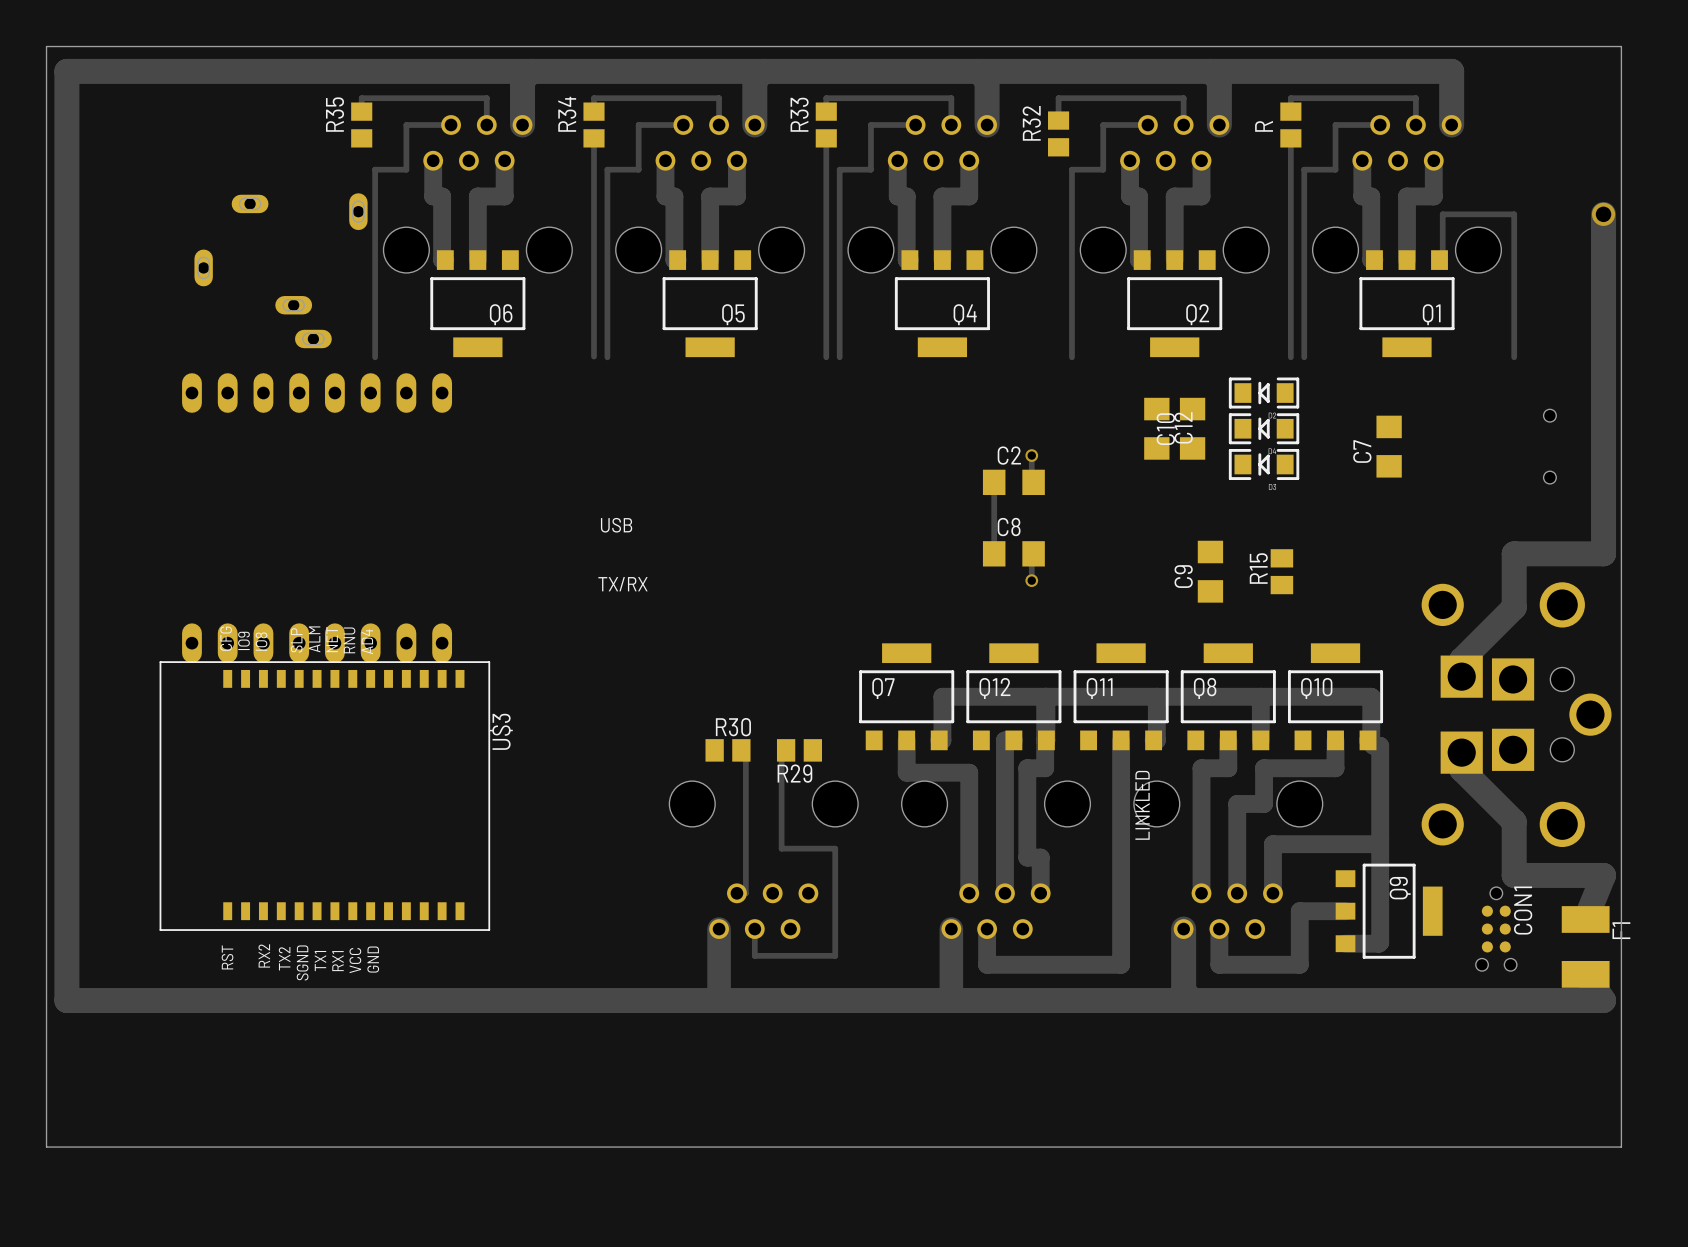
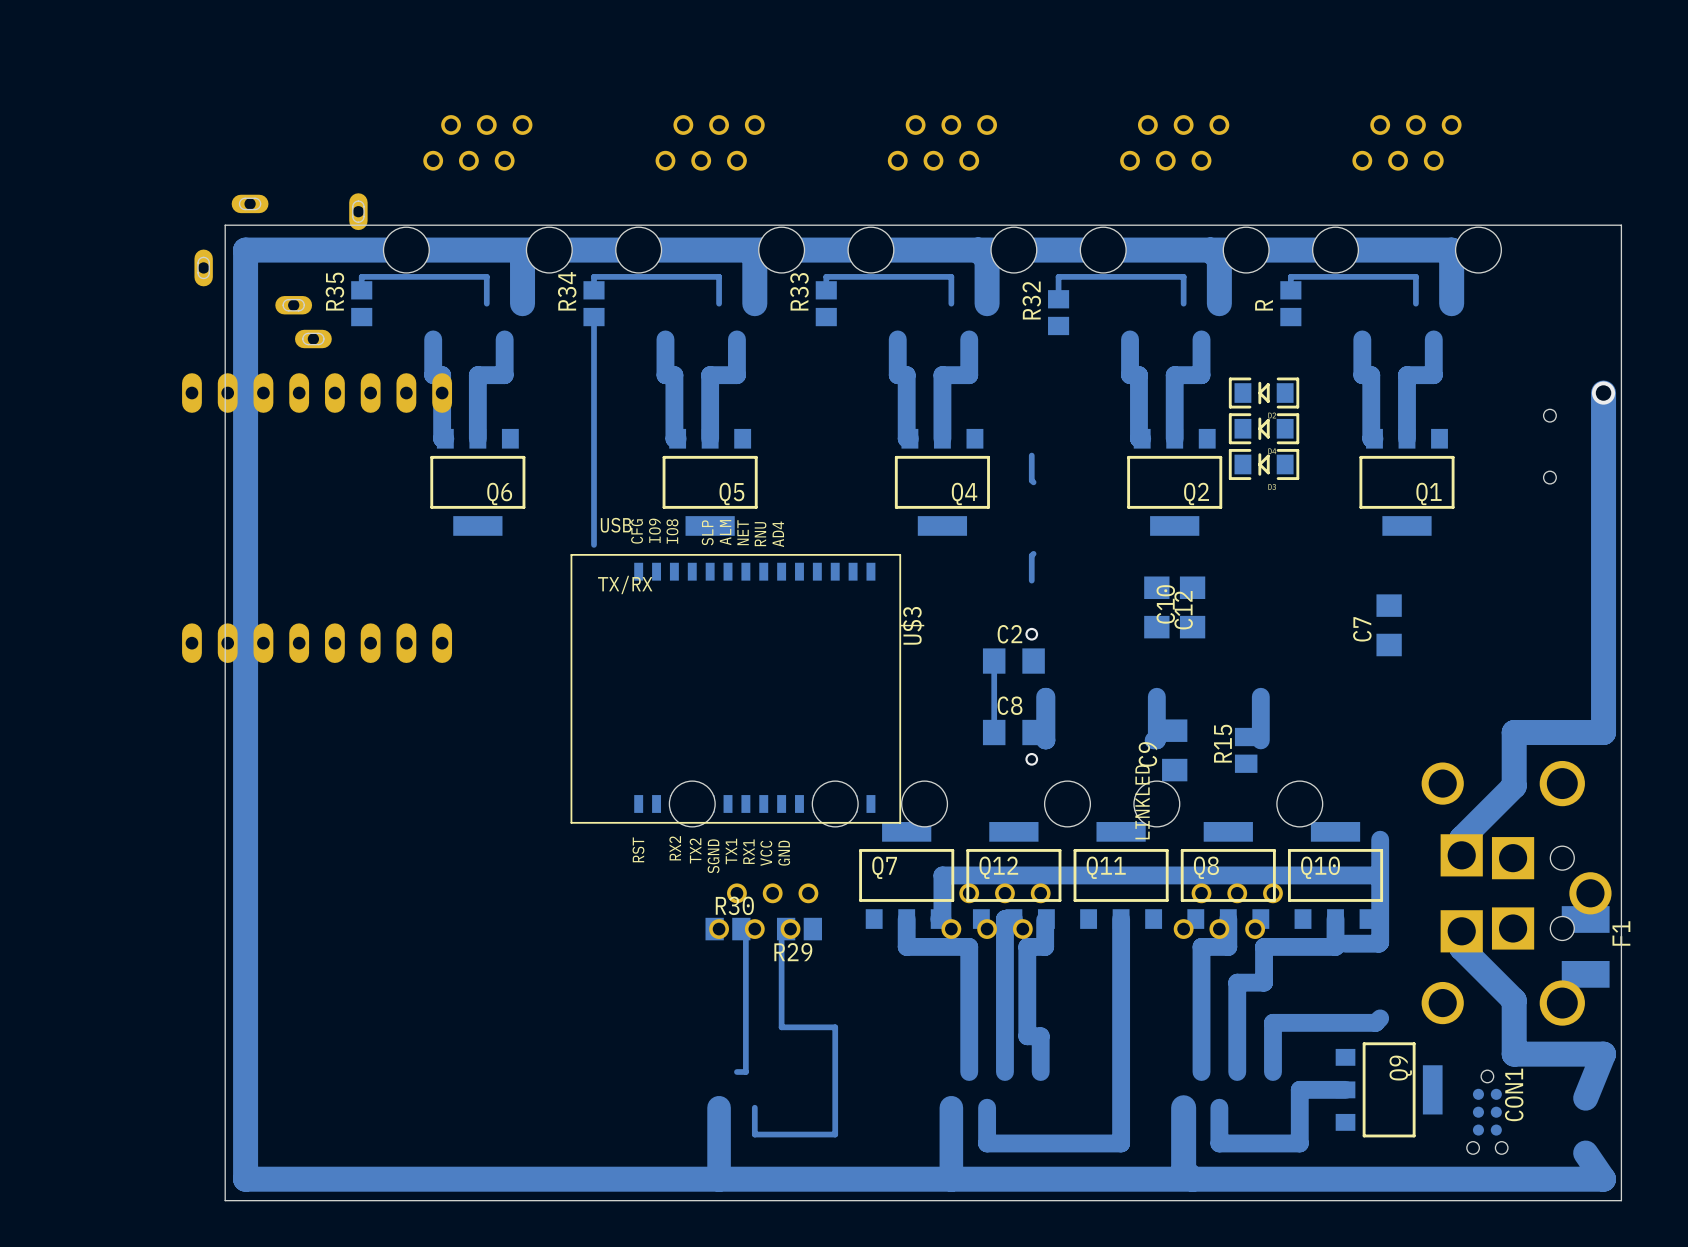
track: (531, 71) (522, 80) (522, 125) -> (531, 250) (522, 259) (522, 303)
track: (763, 71) (754, 80) (754, 125) -> (763, 250) (754, 259) (754, 303)
track: (978, 71) (987, 80) (987, 125) -> (978, 250) (987, 259) (987, 303)
track: (1210, 71) (1219, 80) (1219, 125) -> (1210, 250) (1219, 259) (1219, 303)
track: (361, 111) (361, 98) (486, 98) (486, 125) -> (361, 290) (361, 276) (486, 276) (486, 303)
track: (594, 111) (594, 98) (719, 98) (719, 125) -> none
track: (826, 111) (826, 98) (951, 98) (951, 125) -> none
track: (1290, 111) (1290, 98) (1415, 98) (1415, 125) -> none
track: (1058, 120) (1058, 98) (1183, 98) (1183, 125) -> (1058, 299) (1058, 276) (1183, 276) (1183, 303)
R35 position: (361, 125) -> (361, 303)
track: (451, 125) (406, 125) (406, 169) (375, 169) (375, 357) -> none
R34 position: (594, 125) -> (594, 303)
track: (683, 125) (638, 125) (638, 169) (607, 169) (607, 357) -> none
R33 position: (826, 125) -> (826, 303)
track: (915, 125) (870, 125) (870, 169) (839, 169) (839, 357) -> none
track: (1147, 125) (1103, 125) (1103, 169) (1071, 169) (1071, 357) -> none
R position: (1290, 125) -> (1290, 303)
track: (1380, 125) (1335, 125) (1335, 169) (1304, 169) (1304, 357) -> none
track: (1451, 125) (1451, 71) (66, 71) (66, 1000) (1603, 1000) (1585, 974) -> none
R32 position: (1058, 133) -> (1058, 312)
track: (594, 138) (594, 276) -> (719, 303) (719, 276) (594, 276)
track: (826, 138) (826, 276) -> (951, 303) (951, 276) (826, 276)
track: (1290, 138) (1290, 276) -> (1415, 303) (1415, 276) (1290, 276)
track: (433, 160) (433, 196) (442, 196) (442, 260) (445, 260) -> (433, 339) (433, 375) (442, 375) (442, 438) (445, 438)
track: (504, 160) (504, 196) (477, 196) (477, 260) -> (504, 339) (504, 375) (477, 375) (477, 438)
track: (665, 160) (665, 196) (674, 196) (674, 260) (677, 260) -> (665, 339) (665, 375) (674, 375) (674, 438) (677, 438)
track: (736, 160) (736, 196) (710, 196) (710, 260) -> (736, 339) (736, 375) (710, 375) (710, 438)
track: (897, 160) (897, 196) (906, 196) (906, 260) (909, 260) -> (897, 339) (897, 375) (906, 375) (906, 438) (909, 438)
track: (969, 160) (969, 196) (942, 196) (942, 260) -> (969, 339) (969, 375) (942, 375) (942, 438)
track: (1130, 160) (1130, 196) (1138, 196) (1138, 260) (1142, 260) -> (1130, 339) (1130, 375) (1138, 375) (1138, 438) (1142, 438)
track: (1201, 160) (1201, 196) (1174, 196) (1174, 260) -> (1201, 339) (1201, 375) (1174, 375) (1174, 438)
track: (1362, 160) (1362, 196) (1371, 196) (1371, 260) (1374, 260) -> (1362, 339) (1362, 375) (1371, 375) (1371, 438) (1374, 438)
track: (1433, 160) (1433, 196) (1406, 196) (1406, 260) -> (1433, 339) (1433, 375) (1406, 375) (1406, 438)
track: (1603, 214) (1603, 393) -> none
via: (1603, 214) -> none
board edge: (1621, 225) (1621, 46) (46, 46) (46, 1147) (1621, 1147) -> (1621, 225) (225, 225) (225, 1200) (1621, 1200) (1621, 1147)
track: (1439, 260) (1442, 260) (1442, 214) (1514, 214) (1514, 357) -> none
track: (594, 290) (594, 317) -> none
track: (826, 290) (826, 357) -> none
track: (1290, 290) (1290, 357) -> none
Q6 position: (477, 303) -> (477, 482)
Q5 position: (710, 303) -> (710, 482)
Q4 position: (942, 303) -> (942, 482)
Q2 position: (1174, 303) -> (1174, 482)
Q1 position: (1406, 303) -> (1406, 482)
track: none -> (1451, 303) (1451, 250) (245, 250) (245, 1179) (1603, 1179) (1585, 1153)
track: none -> (594, 356) (594, 544)
via: none -> (1603, 393)
C12 position: (1156, 428) -> (1156, 607)
C10 position: (1192, 428) -> (1192, 607)
C7 position: (1389, 446) -> (1389, 625)
via: (1031, 455) -> none
track: (994, 482) (994, 553) -> (994, 661) (994, 732)
C2 position: (1013, 482) -> (1013, 661)
C8 position: (1013, 553) -> (1013, 732)
track: (1603, 553) (1514, 553) (1514, 607) (1461, 659) (1461, 676) -> (1603, 553) (1603, 732) (1514, 732) (1514, 786) (1461, 838) (1461, 855)
C9 position: (1210, 571) -> (1174, 750)
R15 position: (1281, 571) -> (1246, 750)
via position: (1031, 580) -> (1031, 634)
Q7 position: (906, 696) -> (906, 875)
Q12 position: (1013, 696) -> (1013, 875)
Q11 position: (1121, 696) -> (1121, 875)
Q8 position: (1228, 696) -> (1228, 875)
Q10 position: (1335, 696) -> (1335, 875)
track: (1371, 696) (1371, 740) (1368, 740) (1373, 745) (1380, 745) (1380, 839) (1375, 844) (1272, 844) (1272, 893) -> none
track: (1371, 696) (942, 696) (942, 740) (939, 740) -> none
part position: (1516, 714) -> (1516, 893)
track: (906, 740) (906, 772) (969, 772) (969, 893) -> none
track: (1013, 740) (1004, 740) (1004, 893) -> (1013, 919) (1004, 919) (1004, 1072)
track: (1121, 740) (1121, 919) -> none
track: (1228, 740) (1228, 768) (1201, 768) (1201, 893) -> (1228, 919) (1228, 946) (1201, 946) (1201, 1072)
track: (1335, 740) (1335, 768) (1264, 768) (1264, 803) (1237, 803) (1237, 893) -> (1335, 919) (1335, 946) (1264, 946) (1264, 982) (1237, 982) (1237, 1072)
track: (1045, 741) (1045, 768) (1027, 768) (1027, 857) (1040, 857) (1040, 893) -> (1045, 920) (1045, 946) (1027, 946) (1027, 1036) (1040, 1036) (1040, 1072)
R30 position: (728, 750) -> (728, 929)
track: (741, 750) (745, 750) (745, 893) (736, 893) -> (741, 929) (745, 929) (745, 1072) (736, 1072)
track: (786, 750) (781, 750) (781, 848) (835, 848) (835, 955) (754, 955) (754, 929) -> (786, 929) (781, 929) (781, 1027) (835, 1027) (835, 1134) (754, 1134) (754, 1107)
R29 position: (799, 750) -> (799, 929)
track: (1461, 752) (1461, 769) (1514, 821) (1514, 875) (1603, 875) (1585, 919) -> (1461, 931) (1461, 948) (1514, 1000) (1514, 1054) (1603, 1054) (1585, 1098)
via: none -> (1031, 759)
U$3 position: (324, 796) -> (735, 688)
track: none -> (1376, 872) (1371, 875) (942, 875) (942, 919) (939, 919)
track: (1345, 911) (1299, 911) (1299, 964) (1219, 964) (1219, 929) -> (1345, 1089) (1299, 1089) (1299, 1143) (1219, 1143) (1219, 1107)
Q9 position: (1389, 911) -> (1389, 1089)
track: none -> (906, 919) (906, 946) (969, 946) (969, 1072)
track: (719, 929) (719, 1000) -> (719, 1107) (719, 1179)
track: (951, 929) (951, 1000) -> (951, 1107) (951, 1179)
track: (987, 929) (987, 964) (1121, 964) -> (987, 1107) (987, 1143) (1121, 1143) (1121, 964)
track: (1183, 929) (1183, 991) (1192, 1000) -> (1183, 1107) (1183, 1170) (1192, 1179)
CON1 position: (1496, 929) -> (1487, 1112)
track: none -> (1380, 1018) (1375, 1022) (1272, 1022) (1272, 1072)

